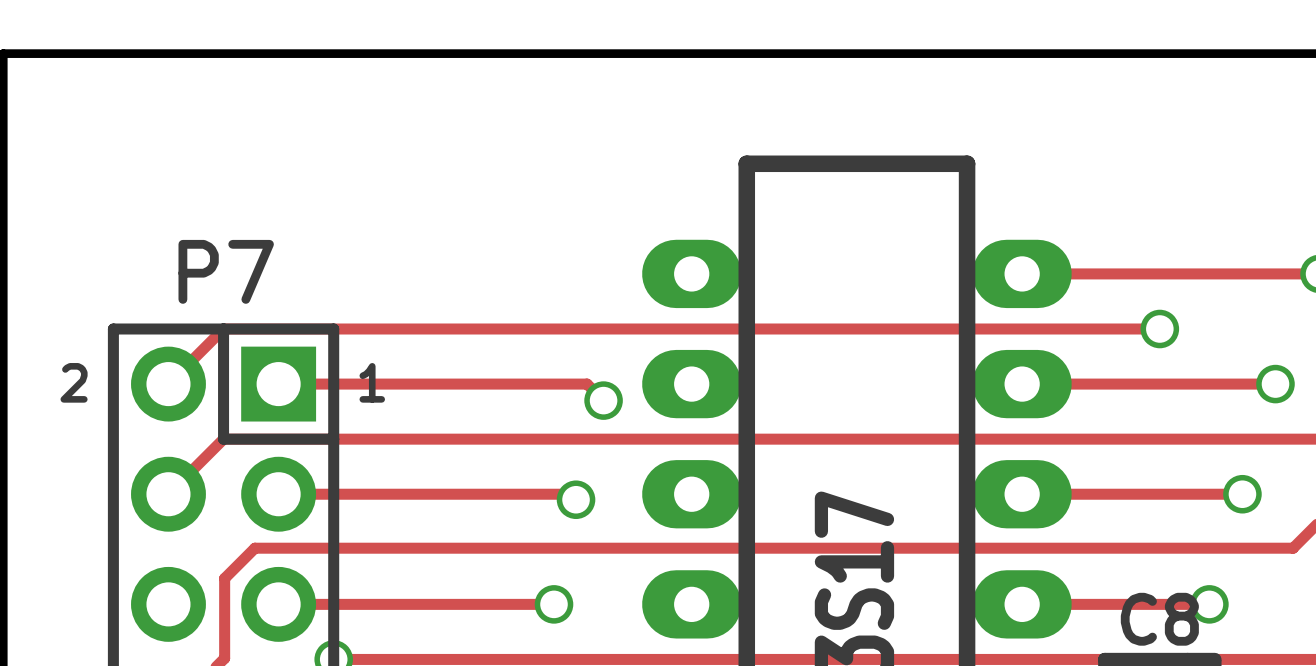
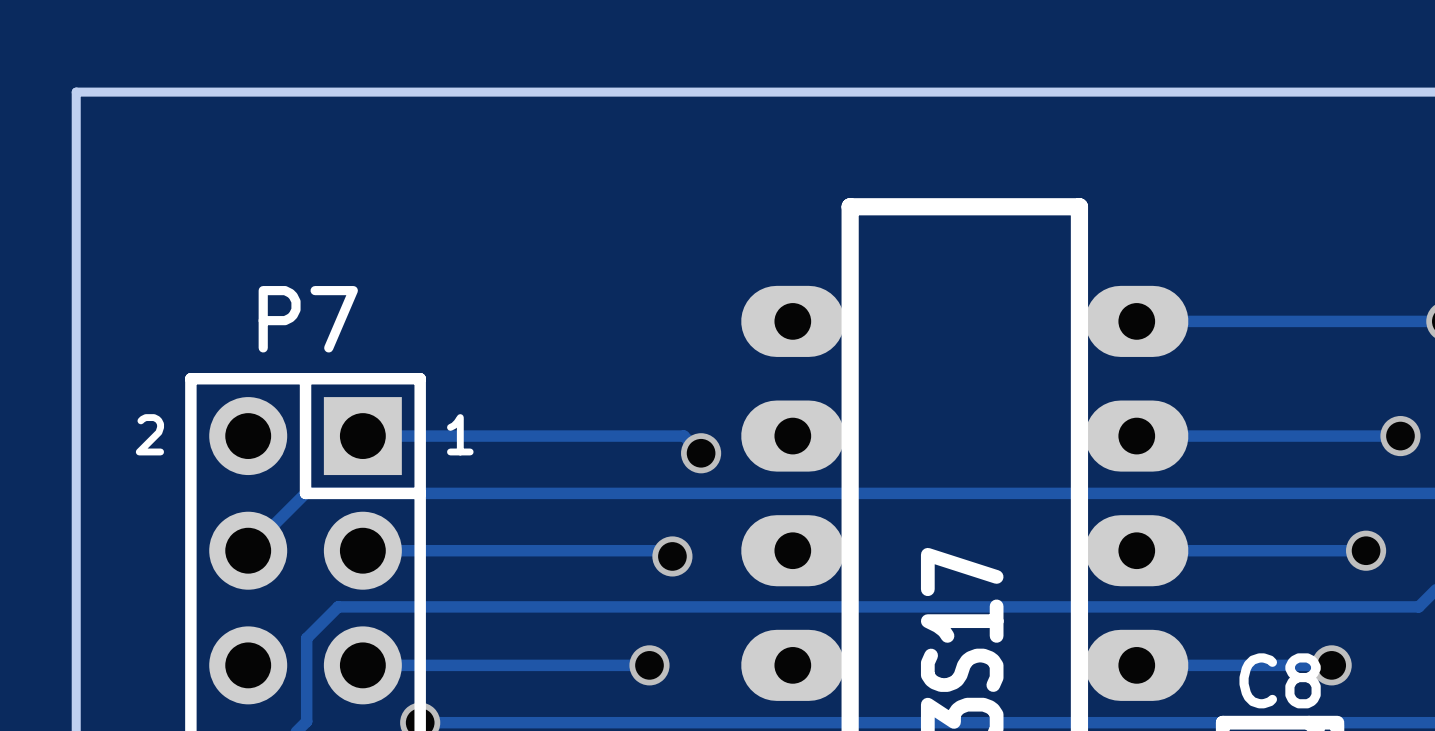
track: (1159, 329) (223, 329) (168, 384) -> none
via: (1159, 329) -> none

